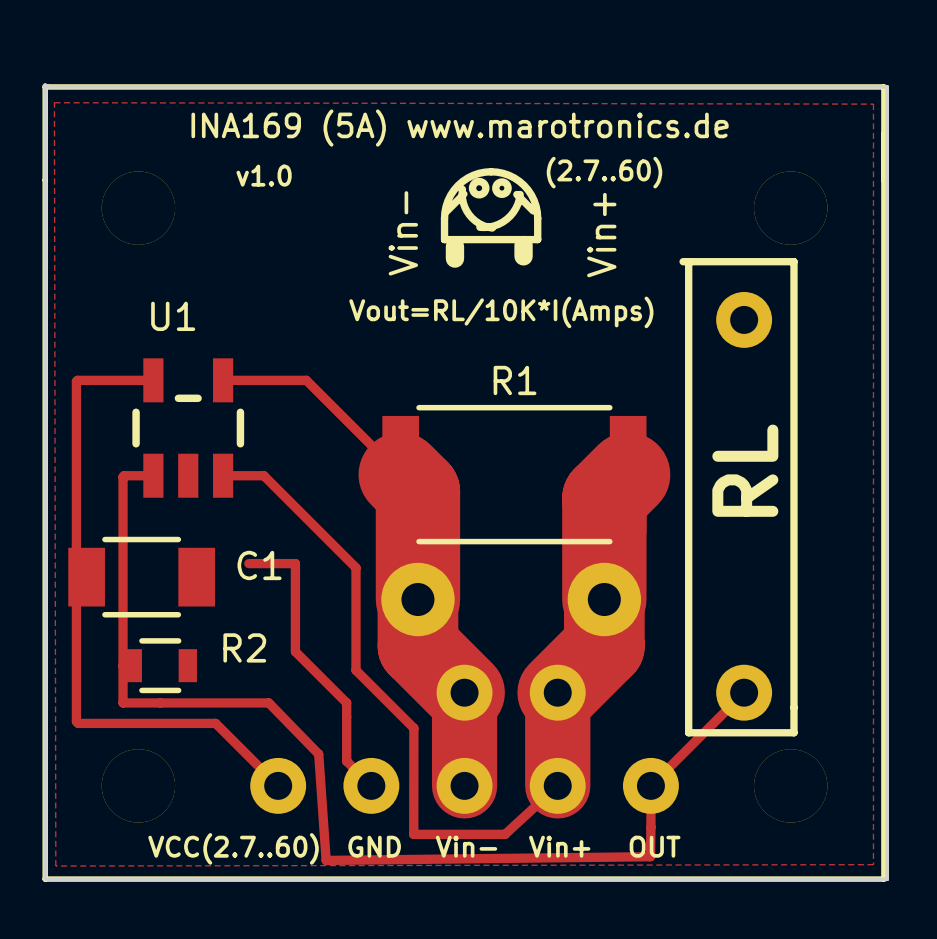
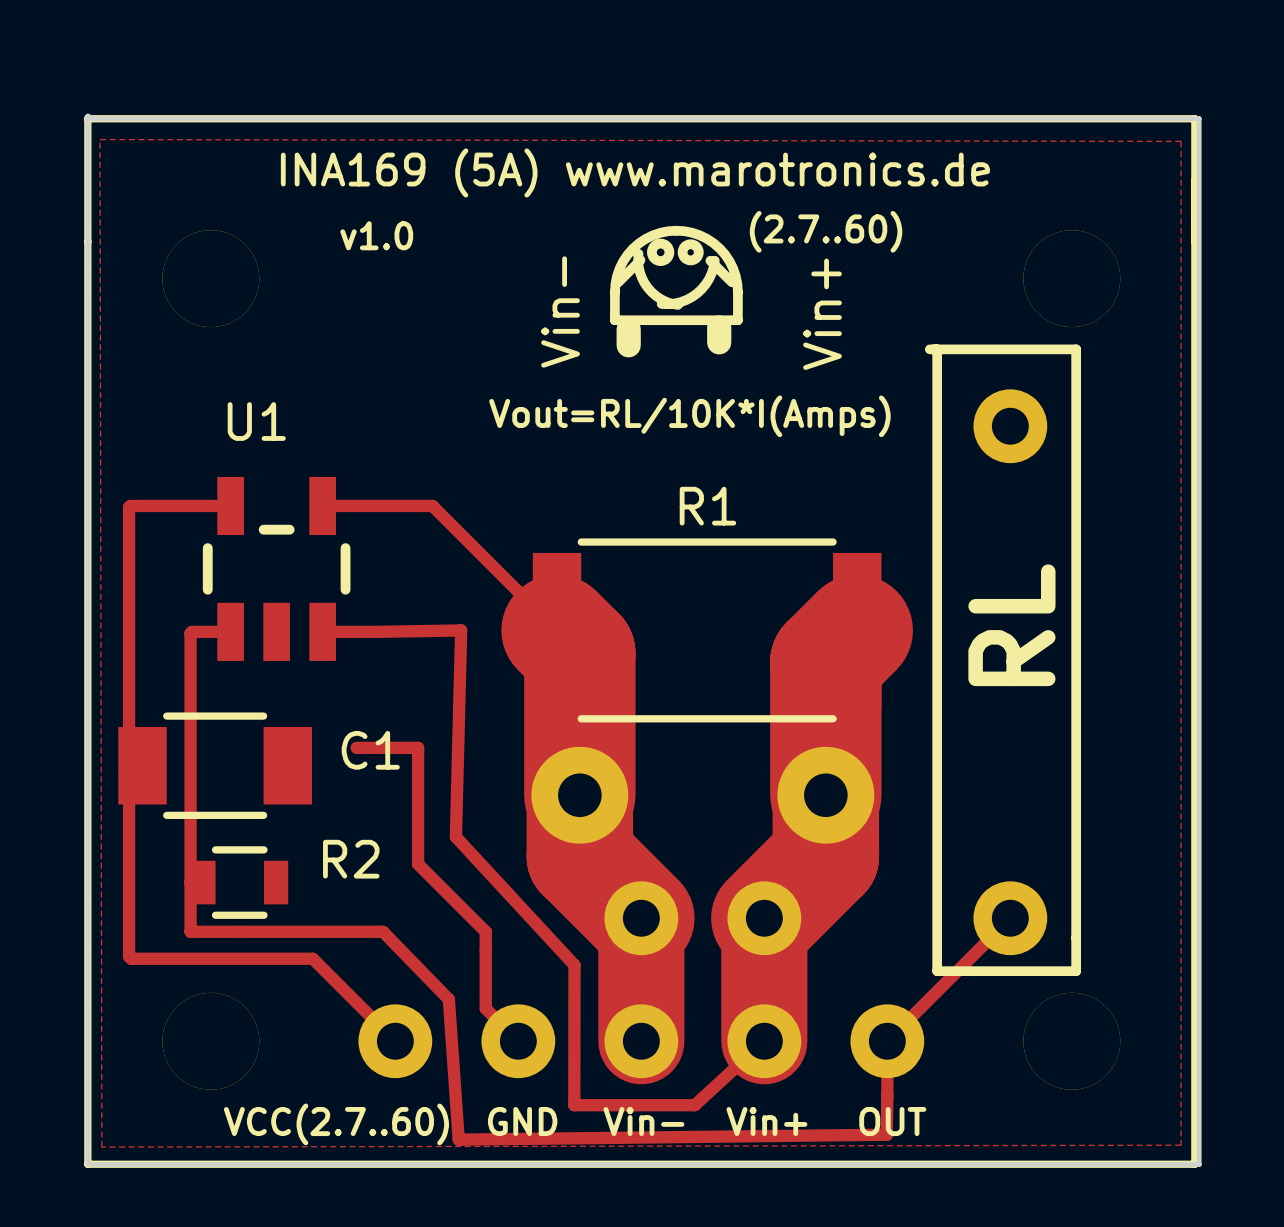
track: (263, 475) (355, 567) (355, 670) (413, 728) -> (376, 631) (461, 630) (455, 836) (574, 965)

